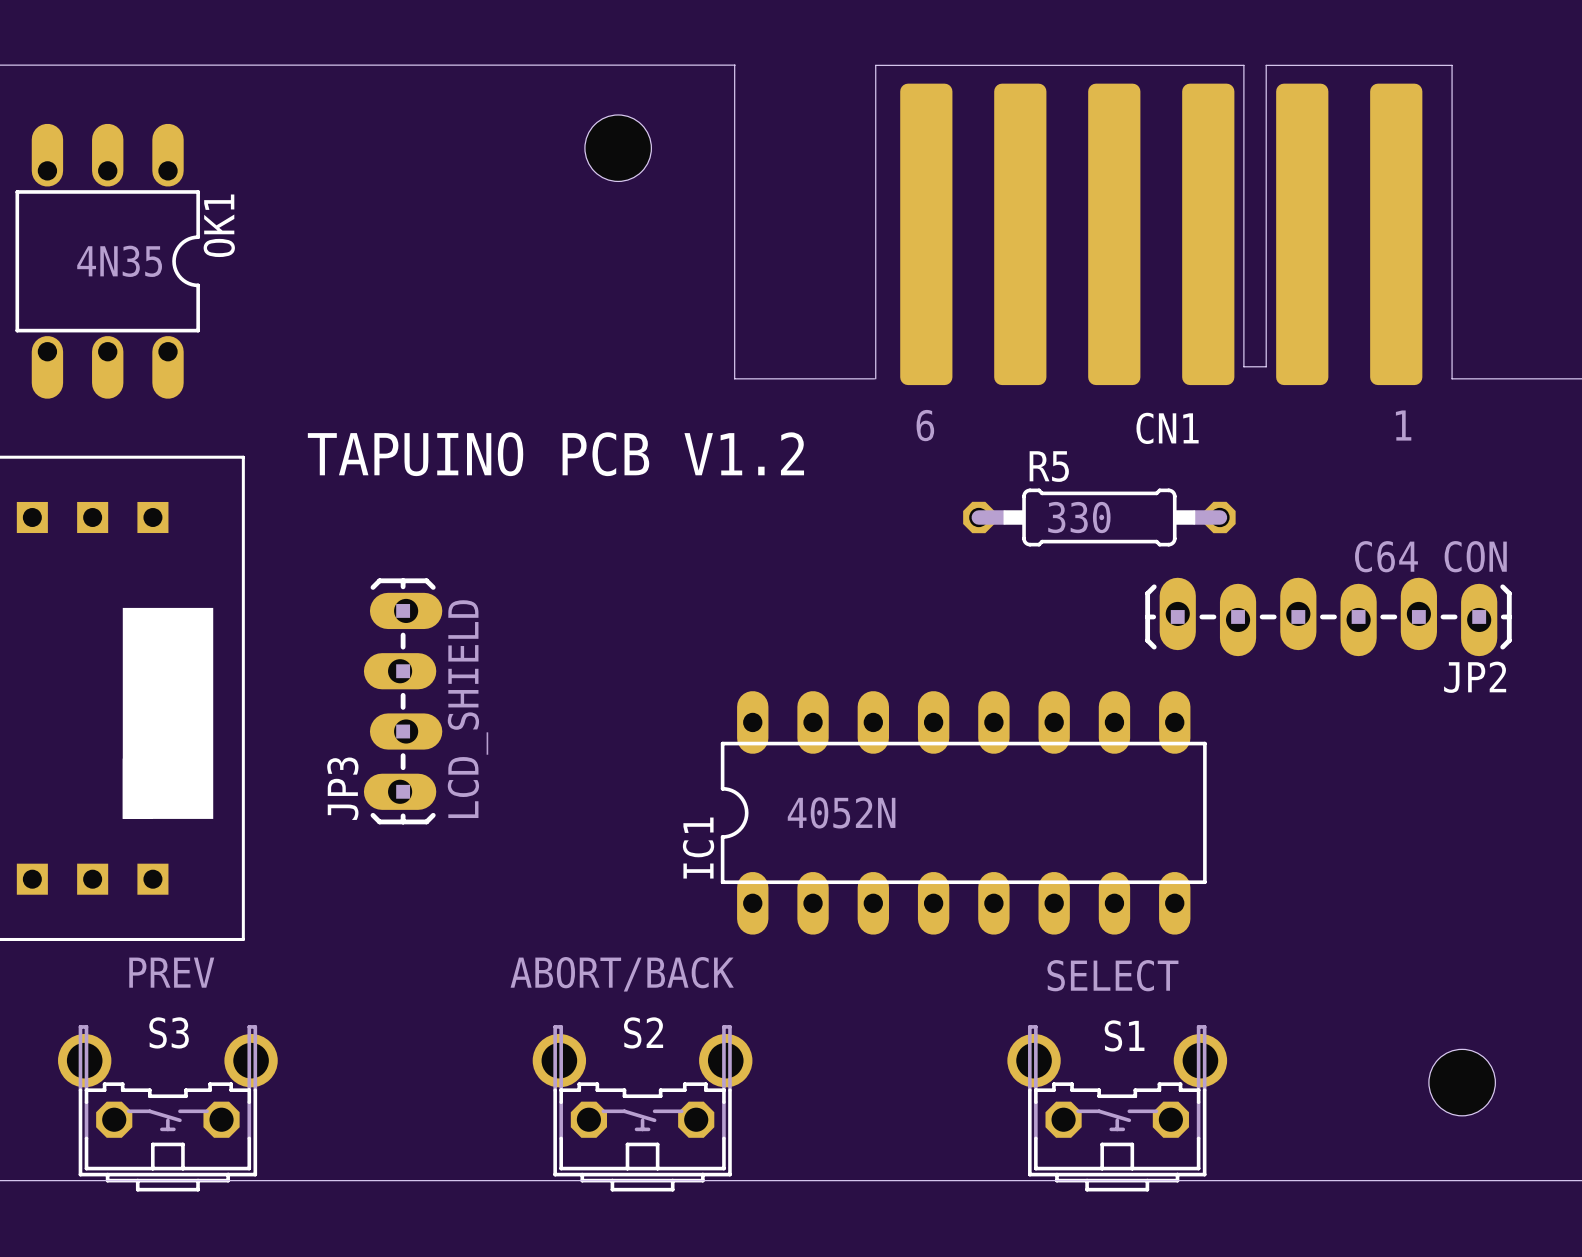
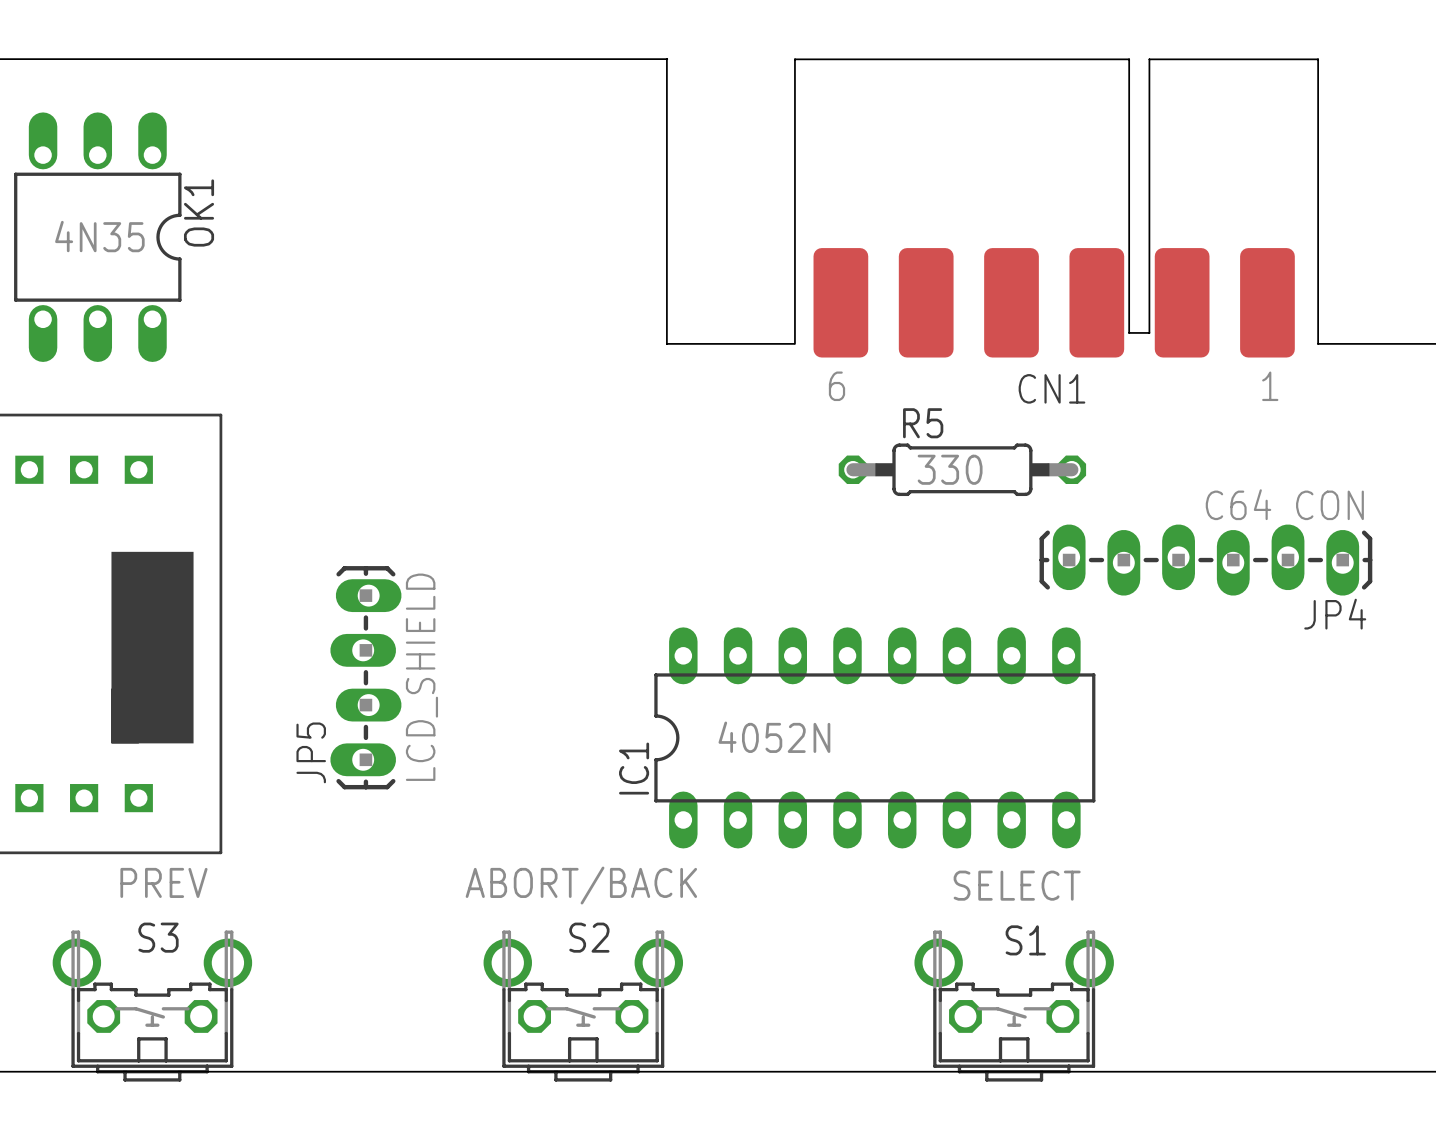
CN1 footprint: [875, 65, 1453, 386] -> [794, 59, 1319, 358]
hole: (618, 148) -> none
text: TAPUINO PCB V1.2 (555, 454) -> none
R5 position: (1099, 517) -> (962, 469)
JP2 name: JP2 (1475, 677) -> JP4 (1335, 614)
JP3: LCD_SHIELD (403, 701) -> none
JP5: none -> LCD_SHIELD (365, 677)
hole: (1462, 1082) -> none

